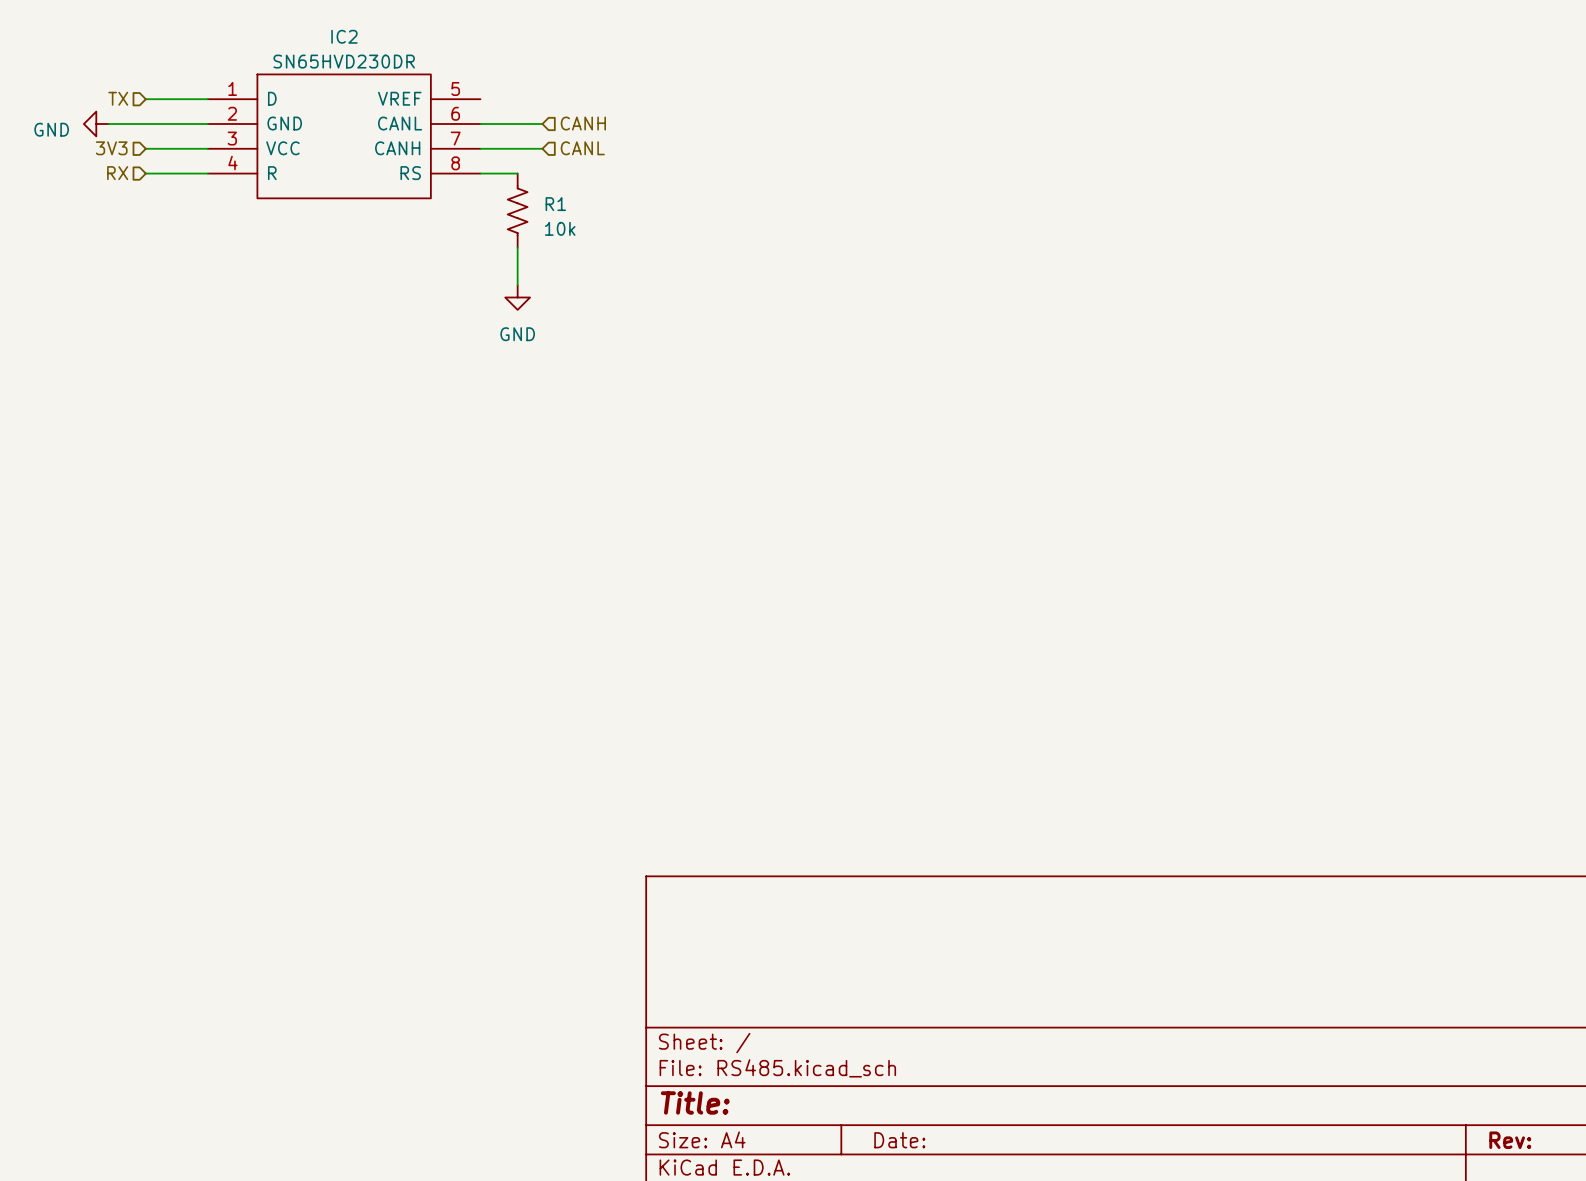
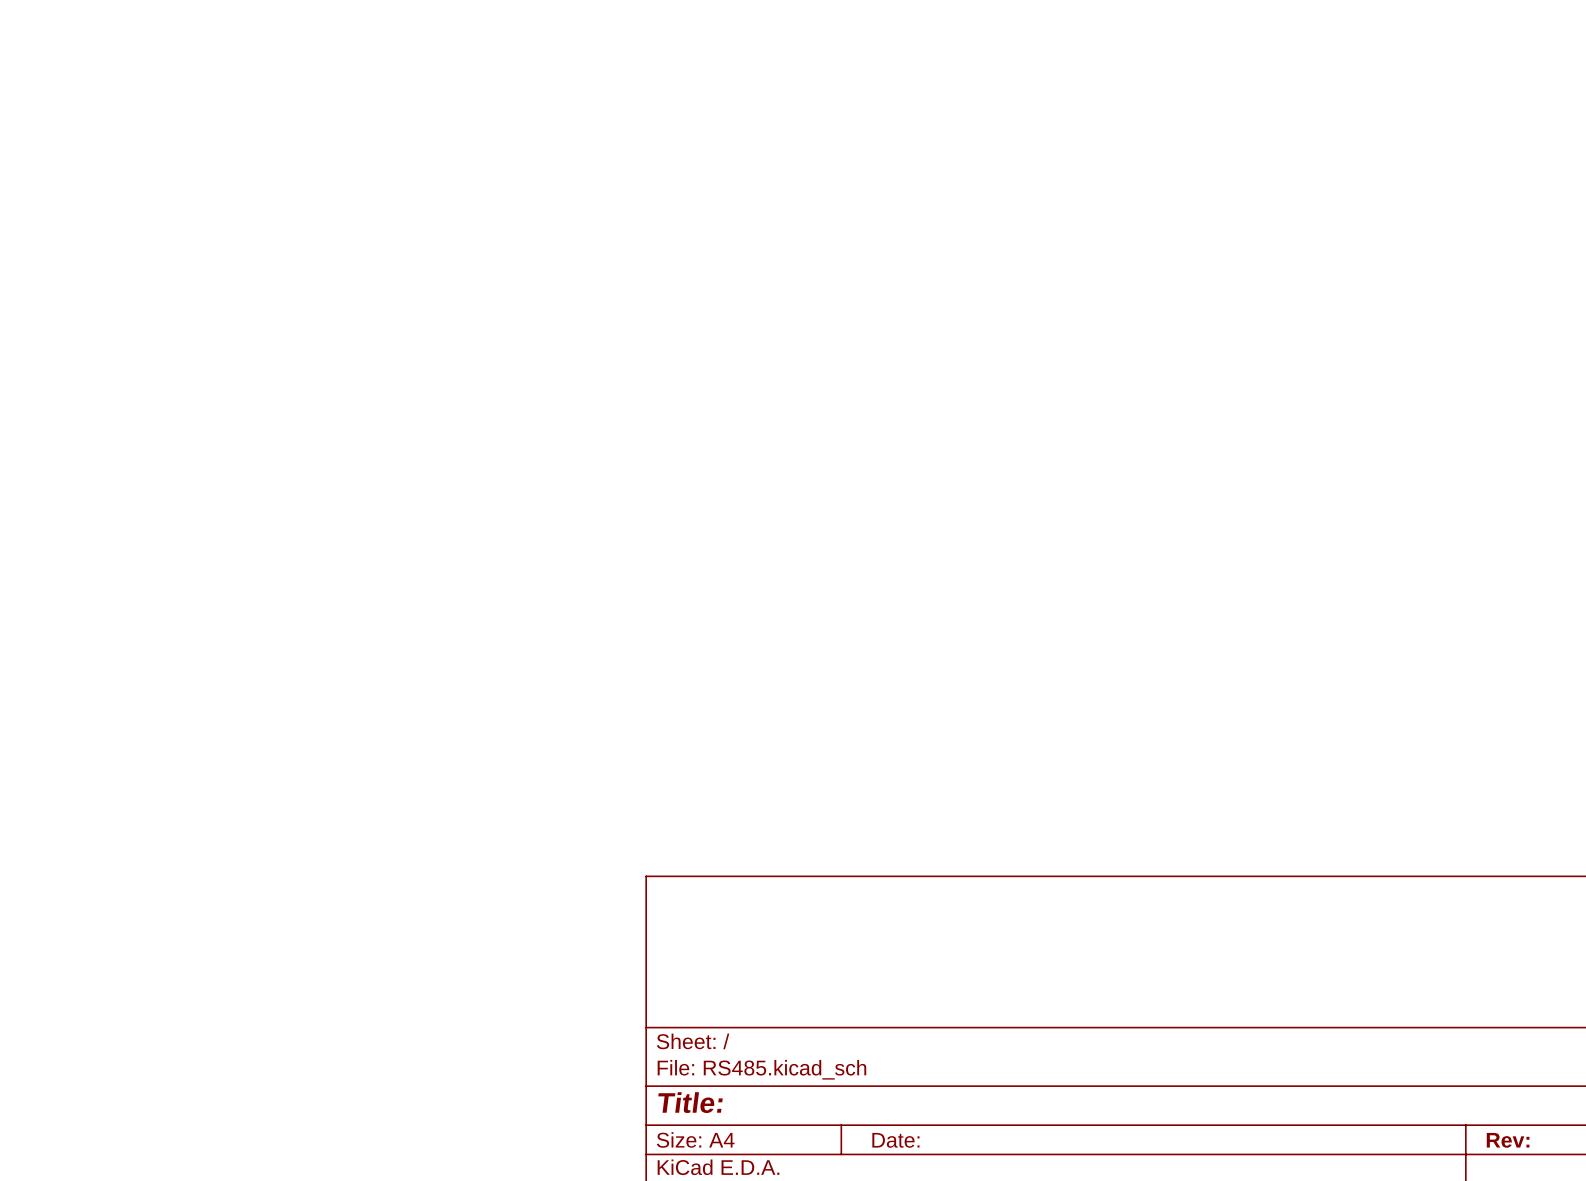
hierarchical label: TX (118, 98) -> none
wire: (145, 99) (207, 99) -> none
power symbol: GND (96, 123) -> none
wire: (108, 123) (207, 123) -> none
wire: (480, 123) (542, 123) -> none
hierarchical label: CANH (583, 123) -> none
IC2: SN65HVD230DR (344, 136) -> none
hierarchical label: 3V3 (111, 148) -> none
wire: (145, 148) (207, 148) -> none
wire: (480, 148) (542, 148) -> none
hierarchical label: CANL (582, 148) -> none
hierarchical label: RX (117, 173) -> none
wire: (145, 173) (207, 173) -> none
wire: (480, 173) (517, 173) -> none
R1: 10k (517, 210) -> none
wire: (517, 247) (517, 285) -> none
power symbol: GND (517, 297) -> none

